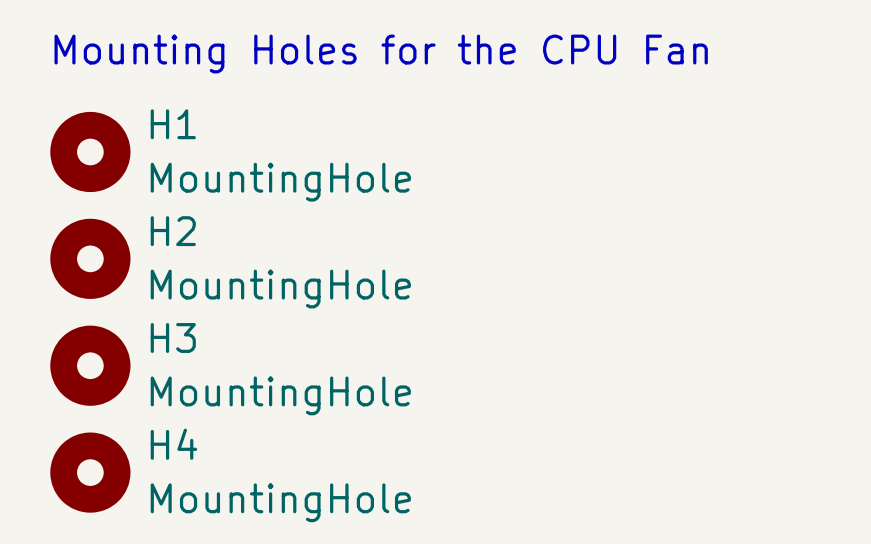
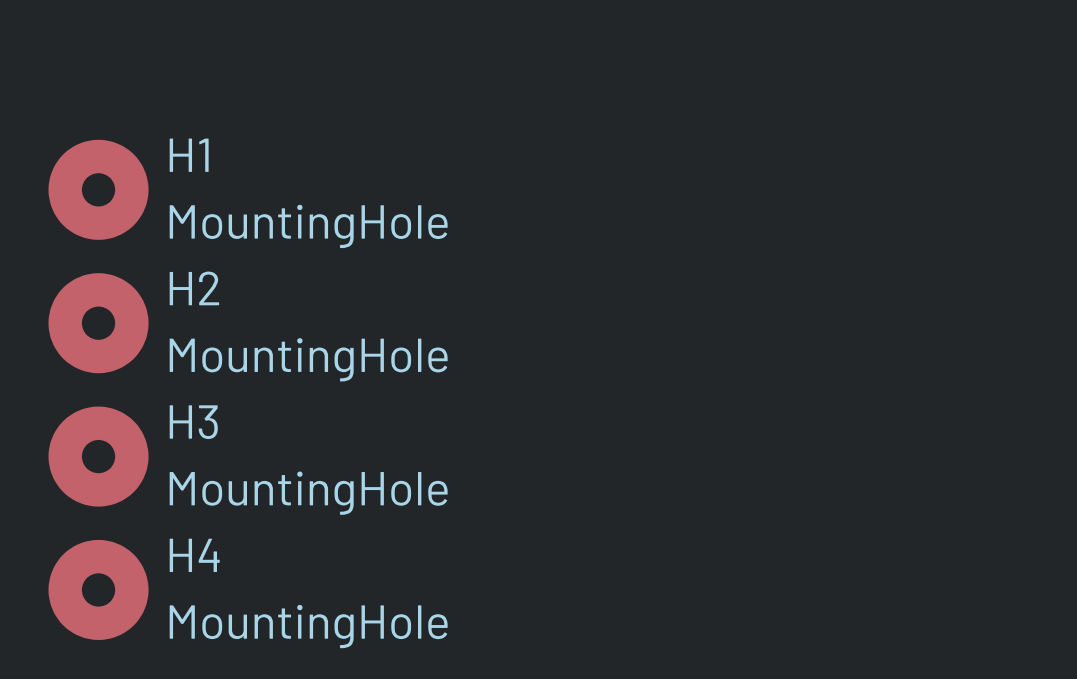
text: Mounting Holes for the CPU Fan (381, 54) -> none

